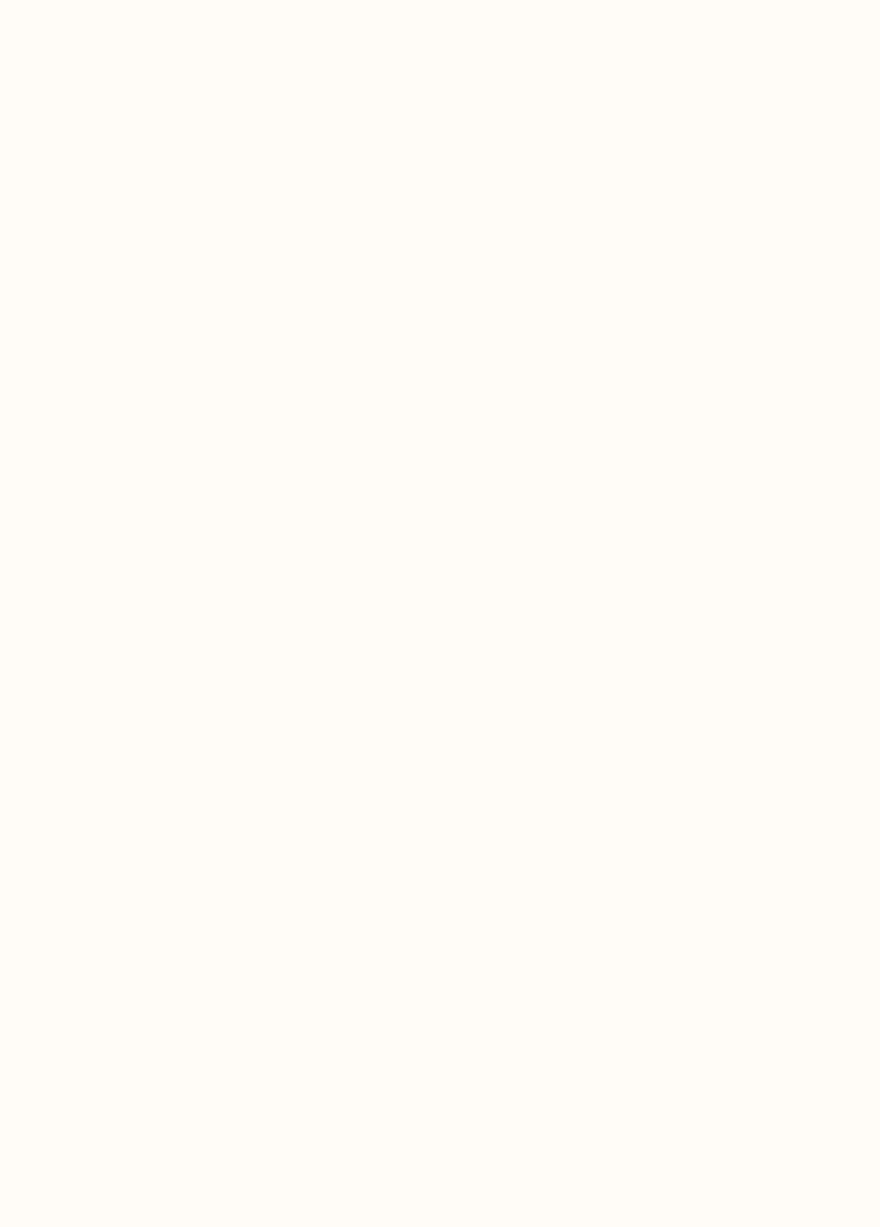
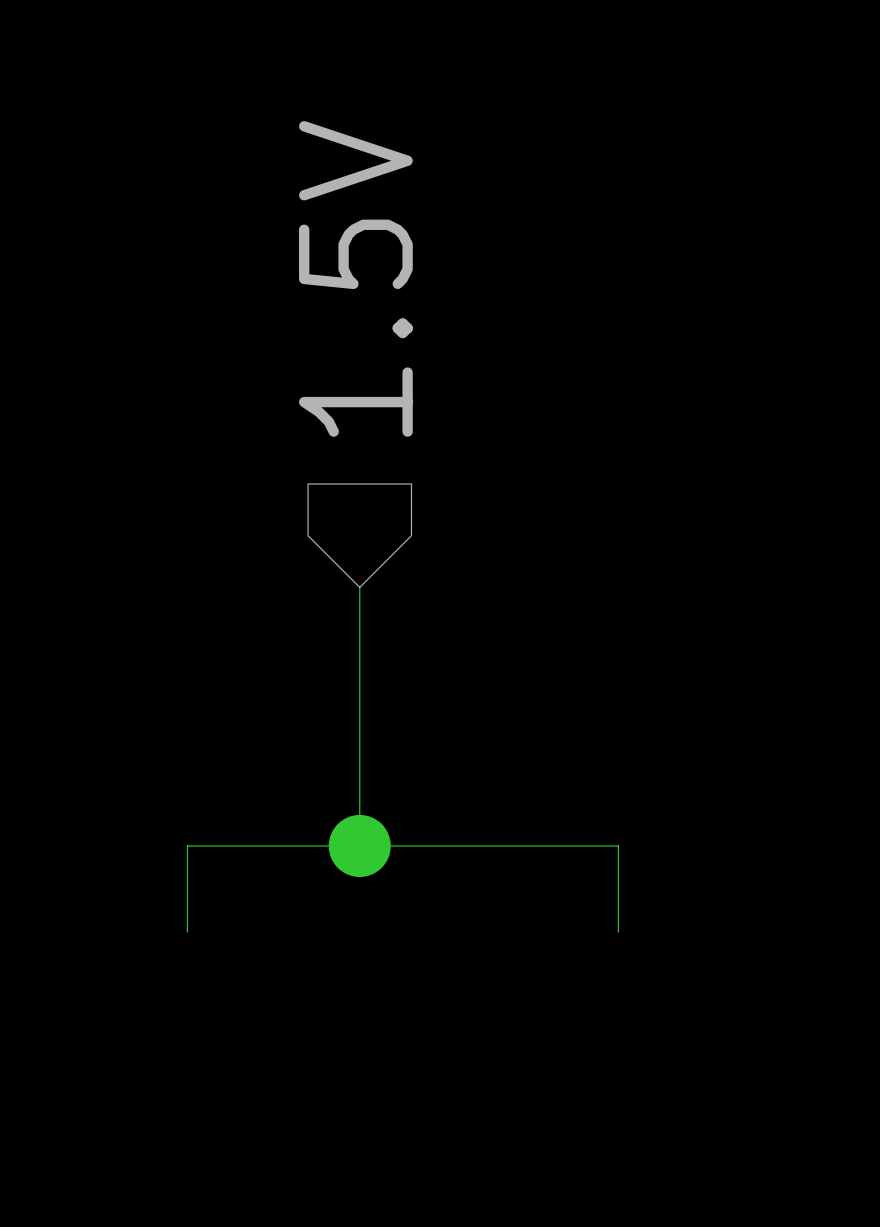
hierarchical label: none -> 1.5V (355, 278)
wire: none -> (359, 587) (359, 845)
junction: none -> (359, 845)
wire: none -> (187, 932) (187, 845) (618, 845) (618, 932)

